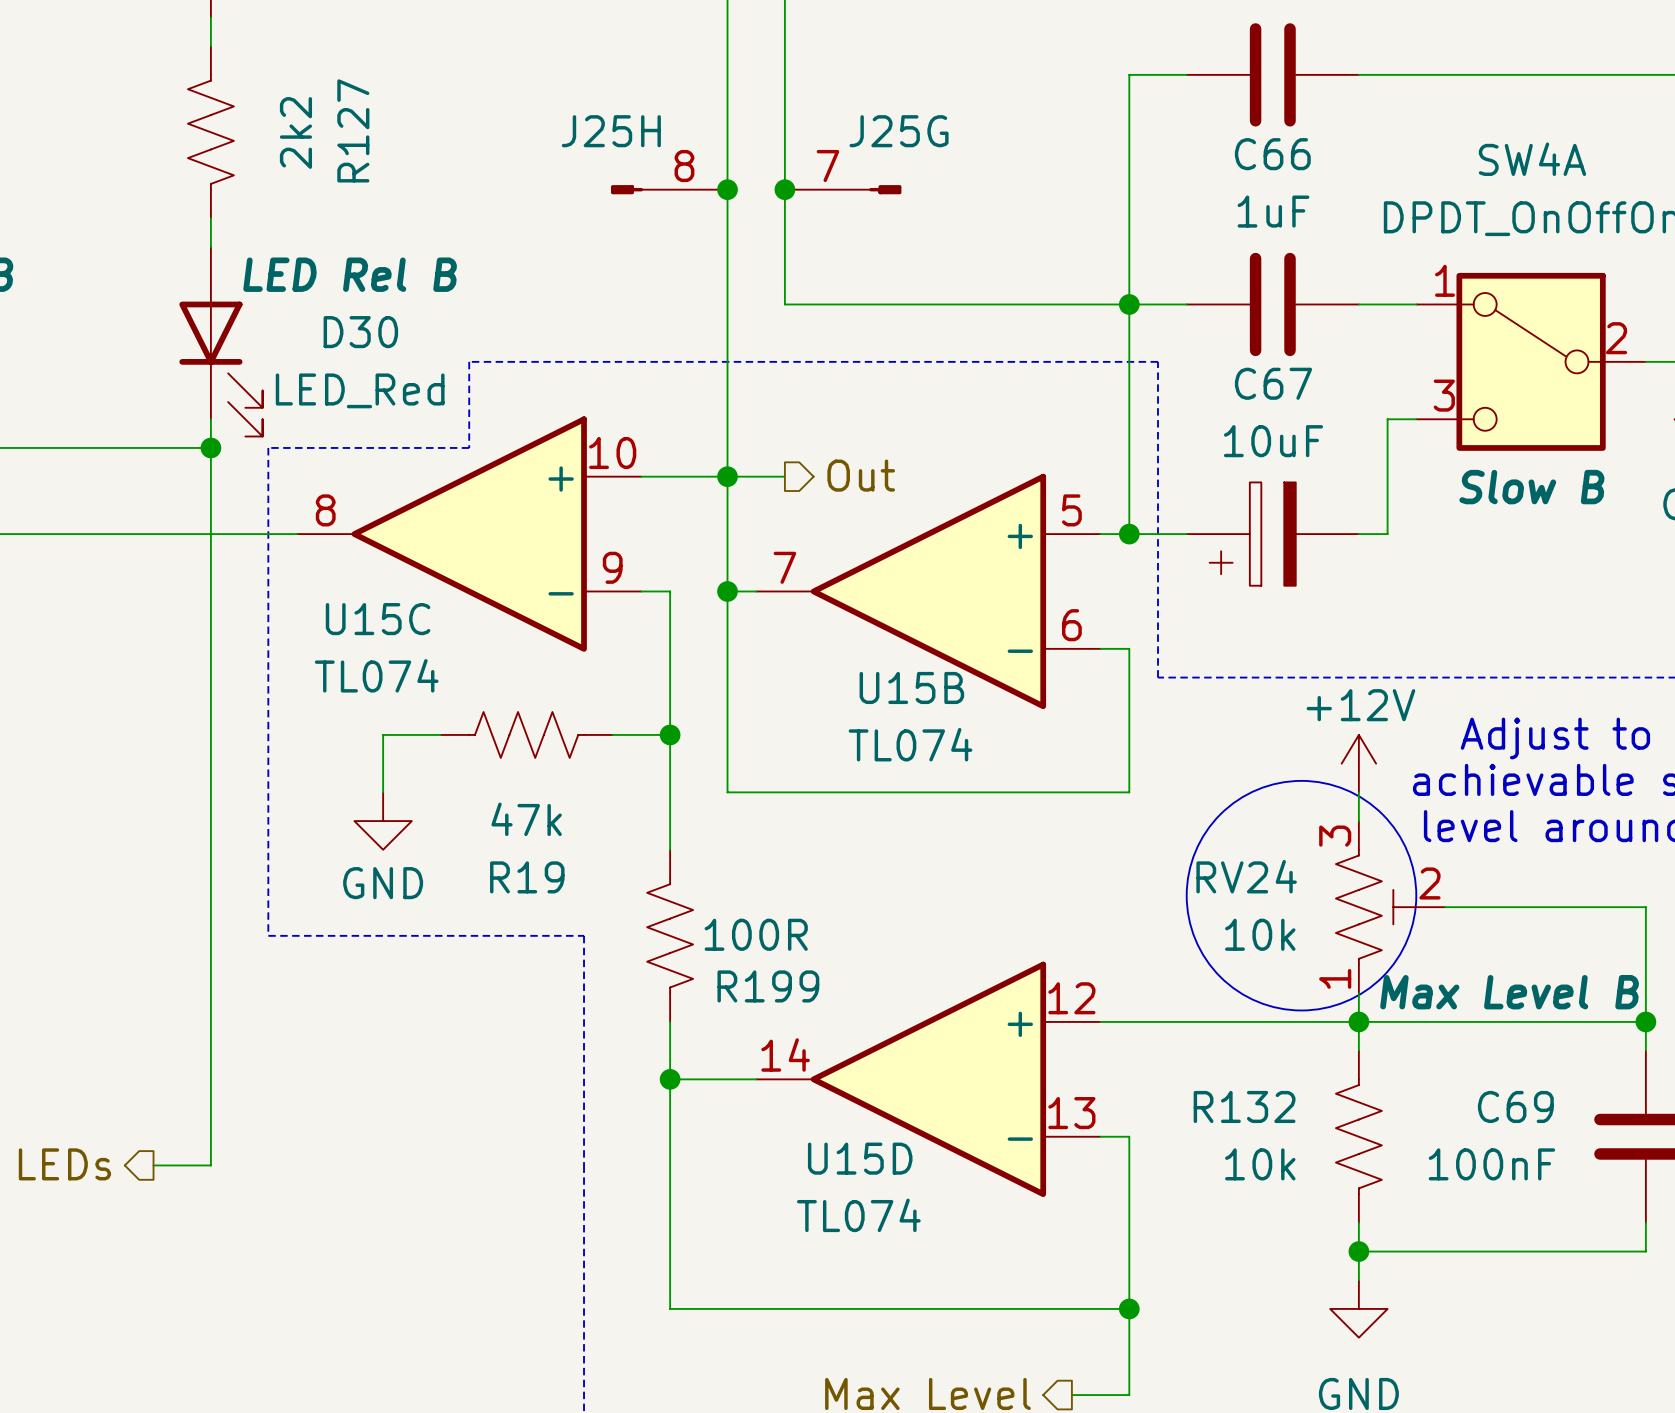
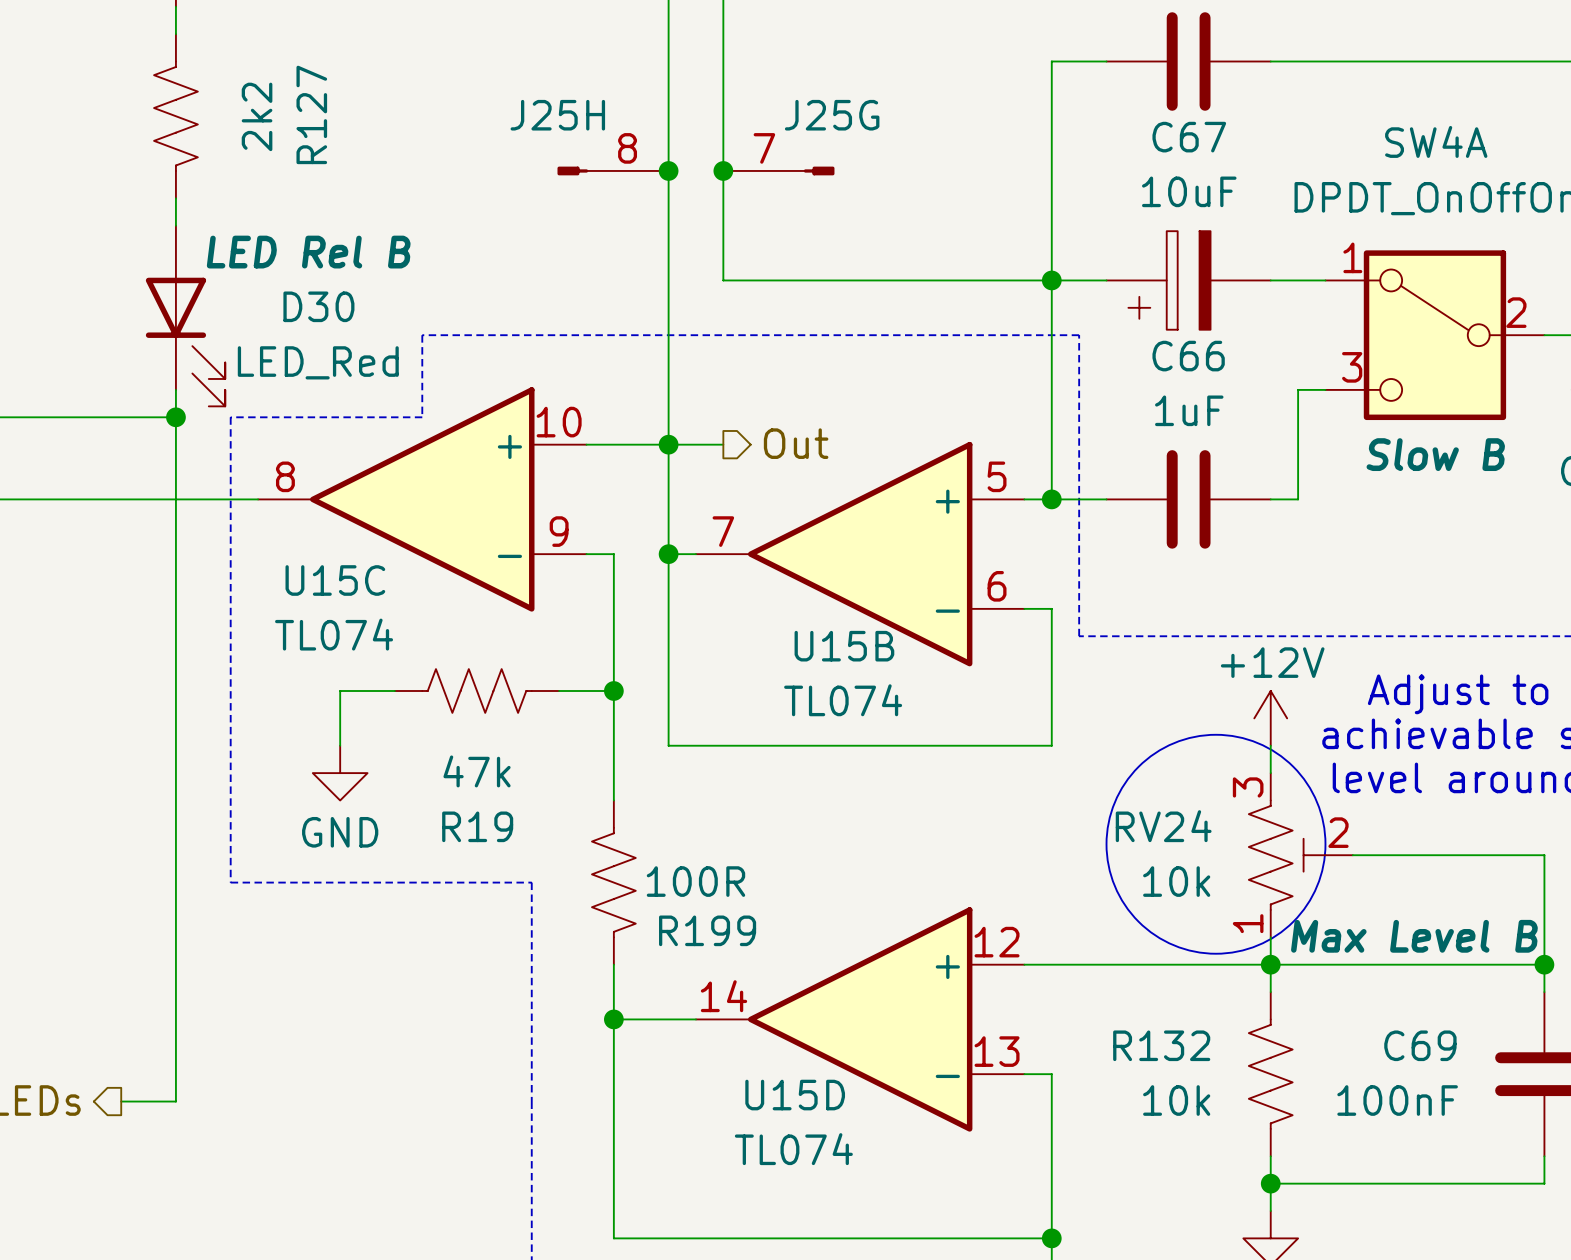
C66 position: (1272, 304) -> (1188, 499)
C67 position: (1272, 534) -> (1188, 280)

